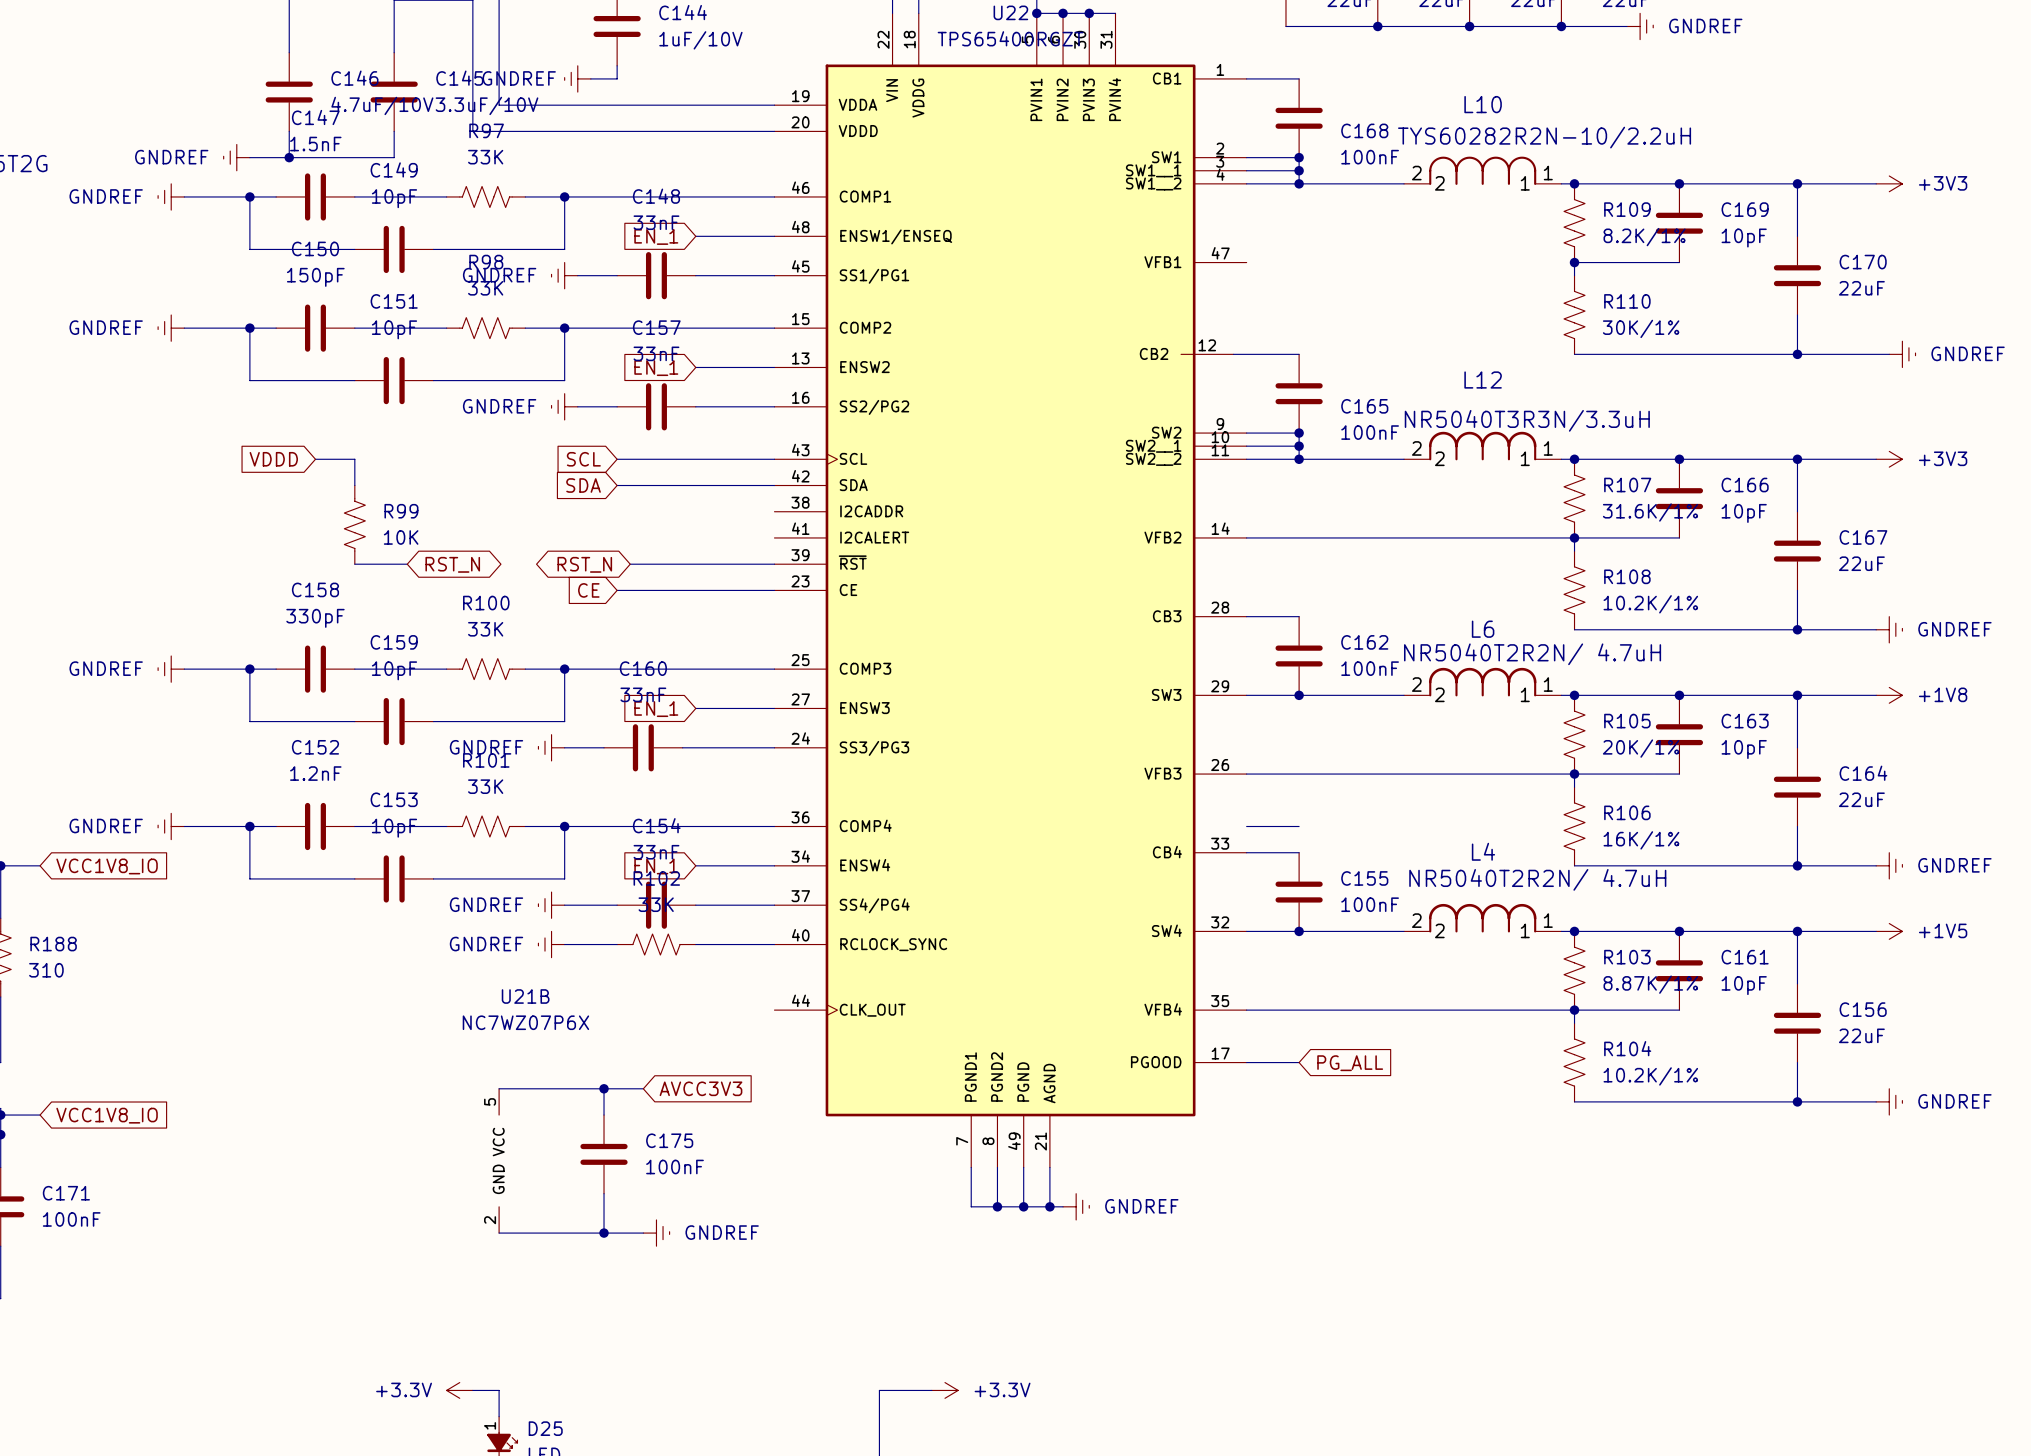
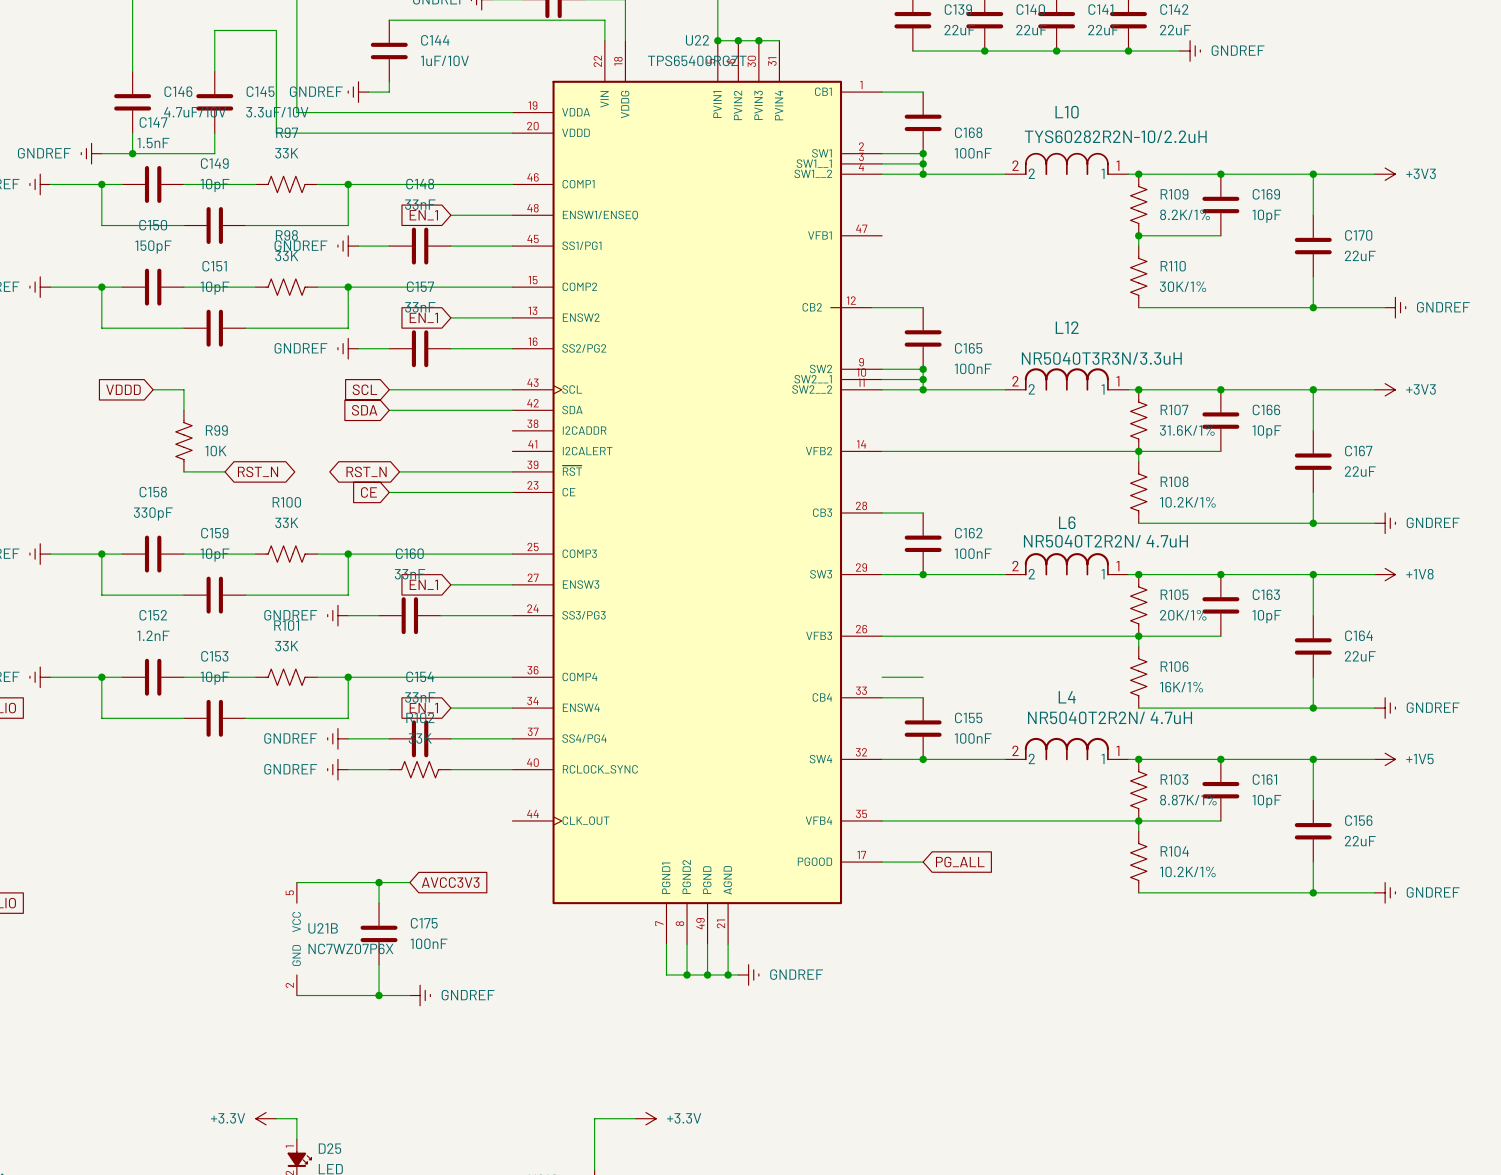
U21B name position: U21B (525, 996) -> U21B (323, 928)
U21B value position: NC7WZ07P6X (525, 1022) -> NC7WZ07P6X (350, 948)

